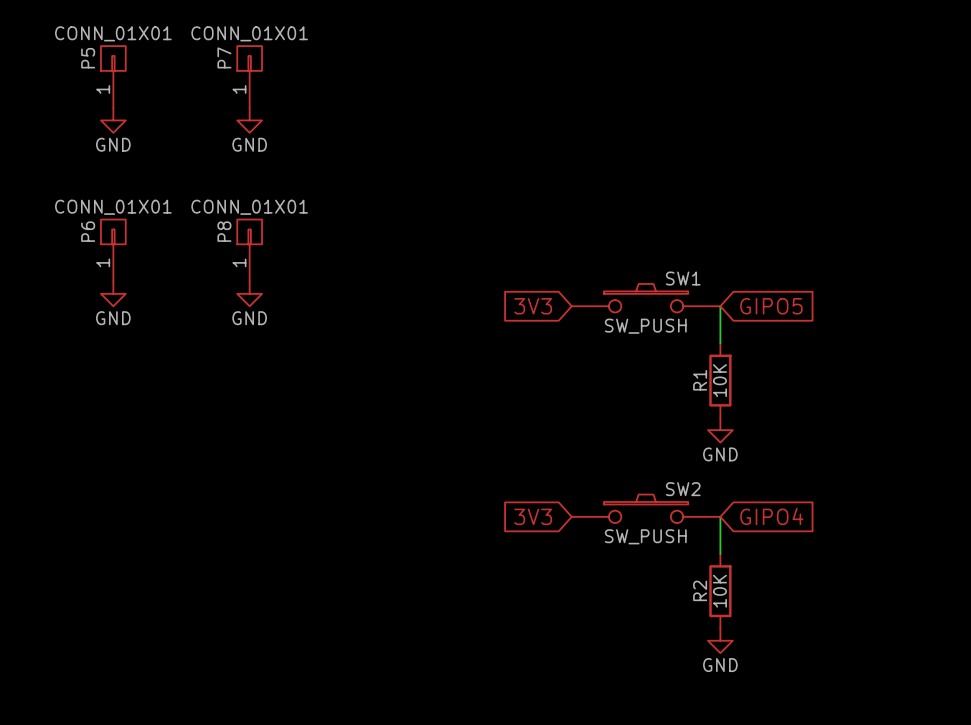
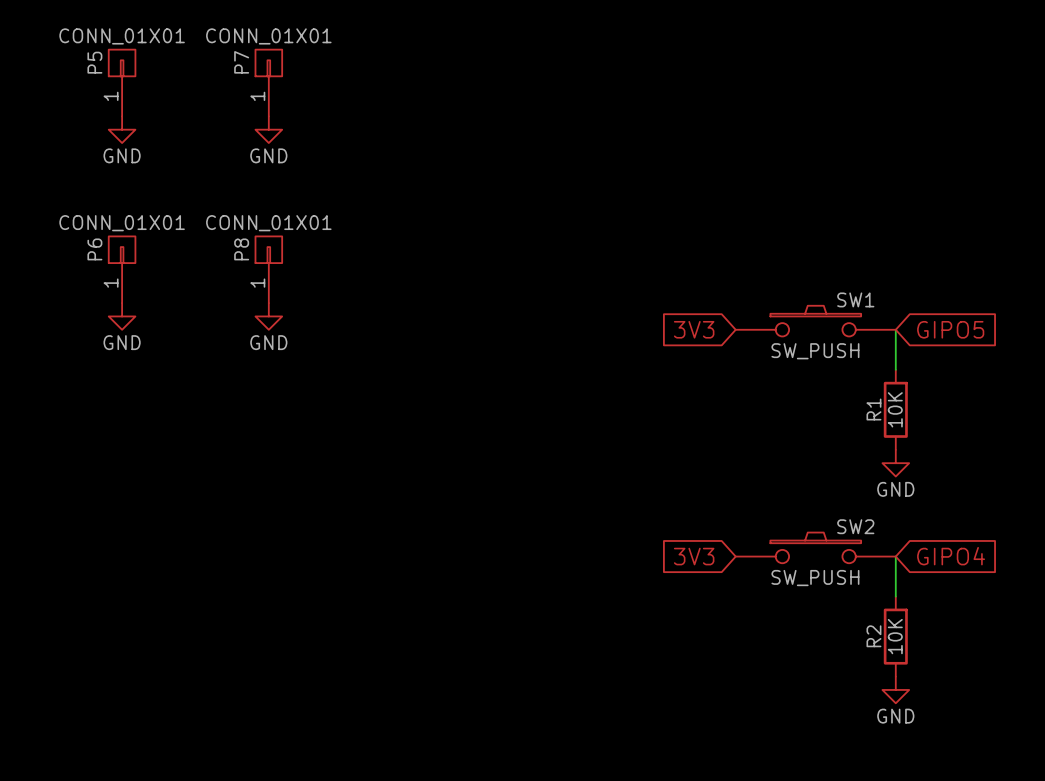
SW1 position: (646, 298) -> (815, 321)
global label position: 3V3 (533, 306) -> 3V3 (694, 329)
wire: (720, 306) (720, 343) -> (895, 329) (895, 369)
global label position: GIPO5 (771, 306) -> GIPO5 (950, 329)
R1 position: (720, 380) -> (895, 409)
power symbol position: GND (720, 430) -> GND (895, 463)
SW2 position: (646, 508) -> (815, 547)
global label position: 3V3 (533, 516) -> 3V3 (694, 556)
wire: (720, 516) (720, 554) -> (895, 556) (895, 596)
global label position: GIPO4 (771, 516) -> GIPO4 (951, 556)
R2 position: (720, 591) -> (895, 636)
power symbol position: GND (720, 640) -> GND (895, 689)

